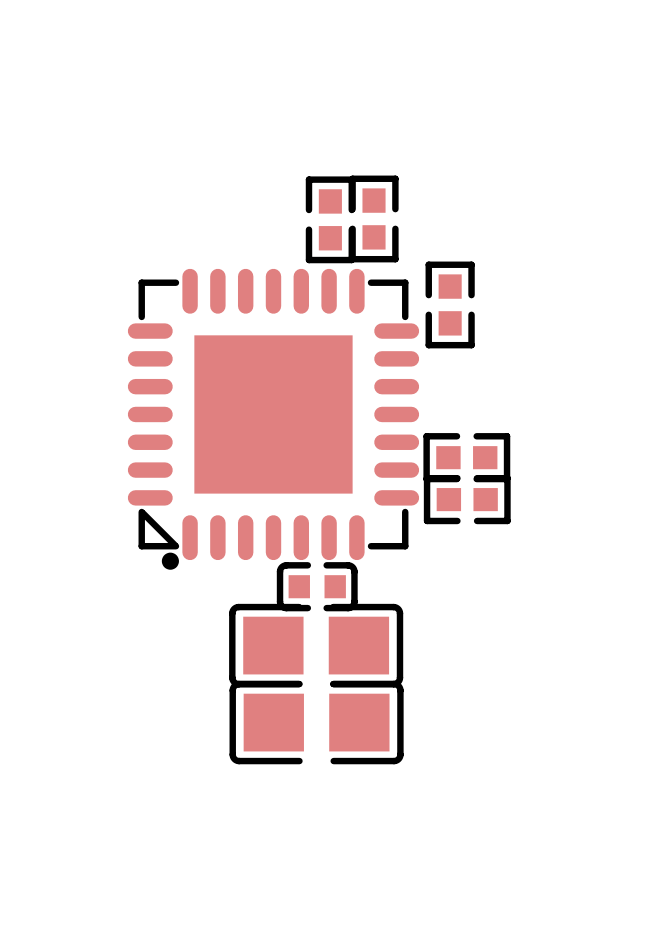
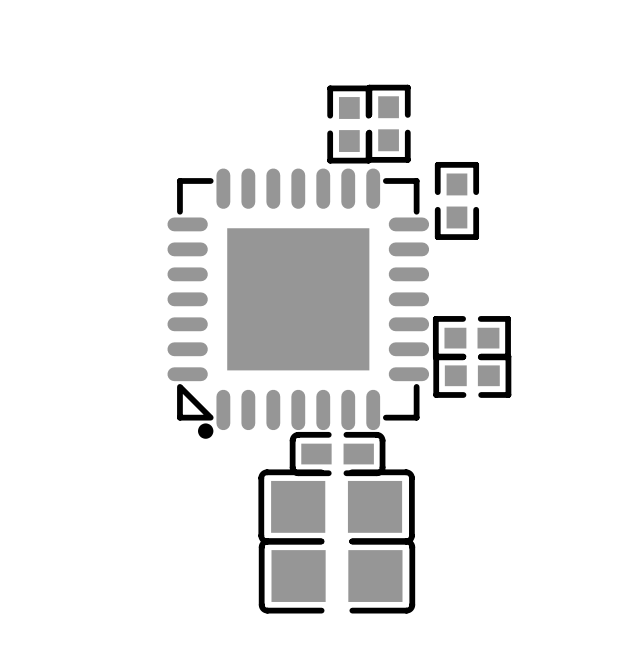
part footprint: [276, 562, 358, 612] -> [289, 431, 386, 477]

